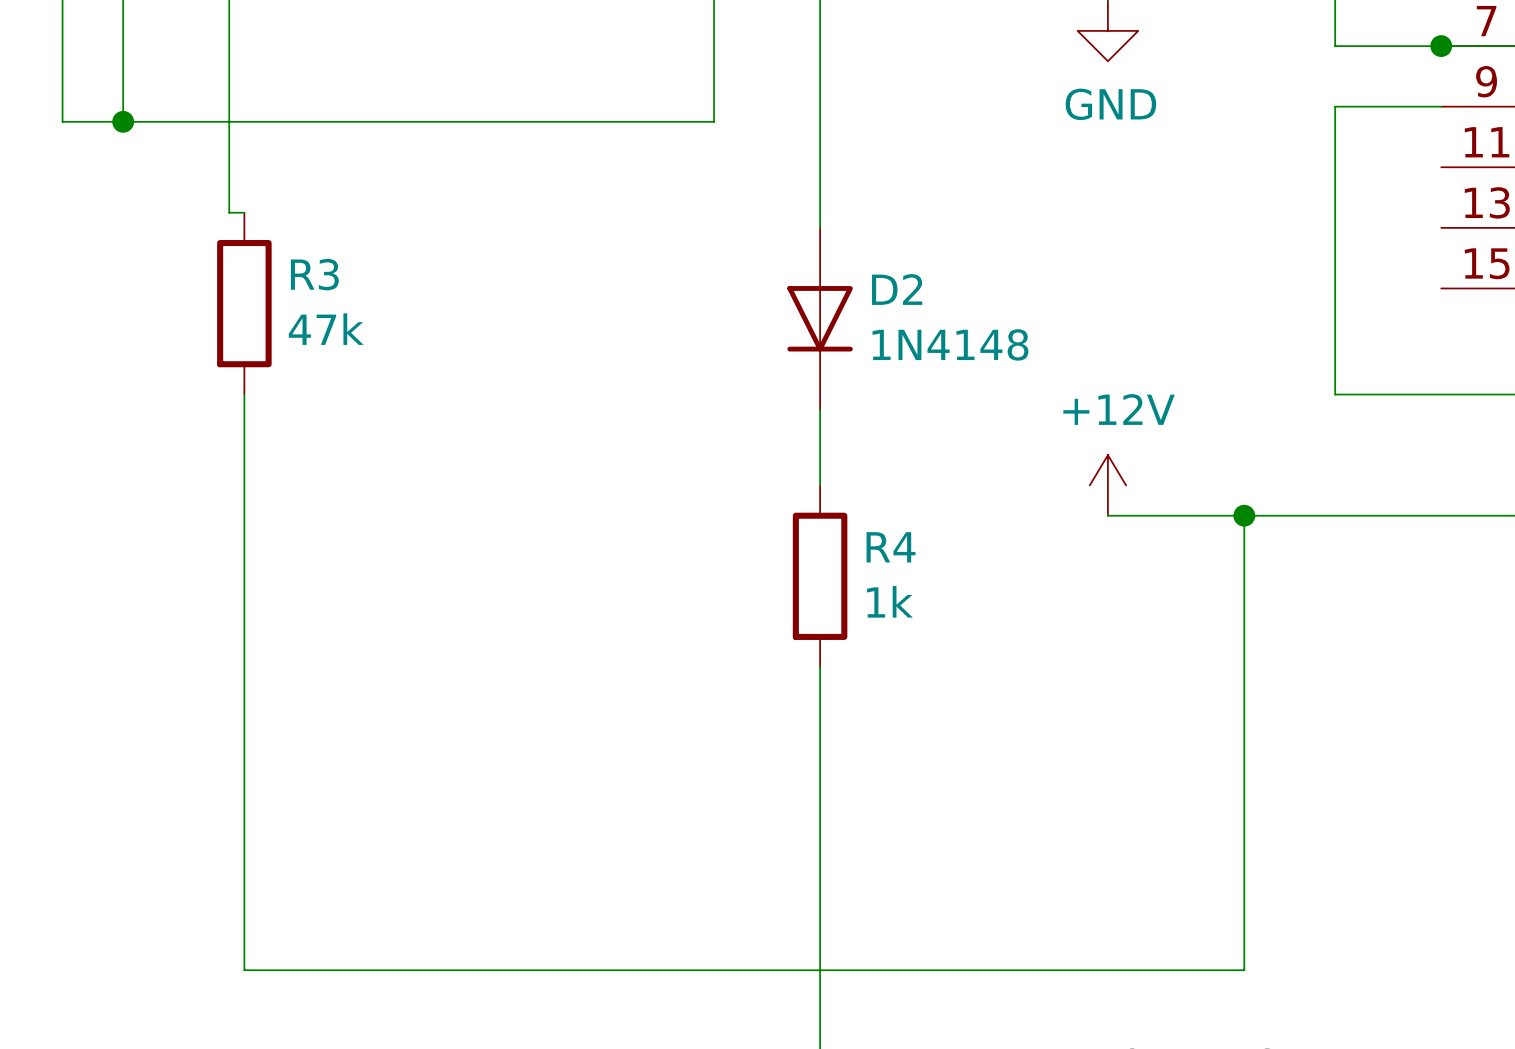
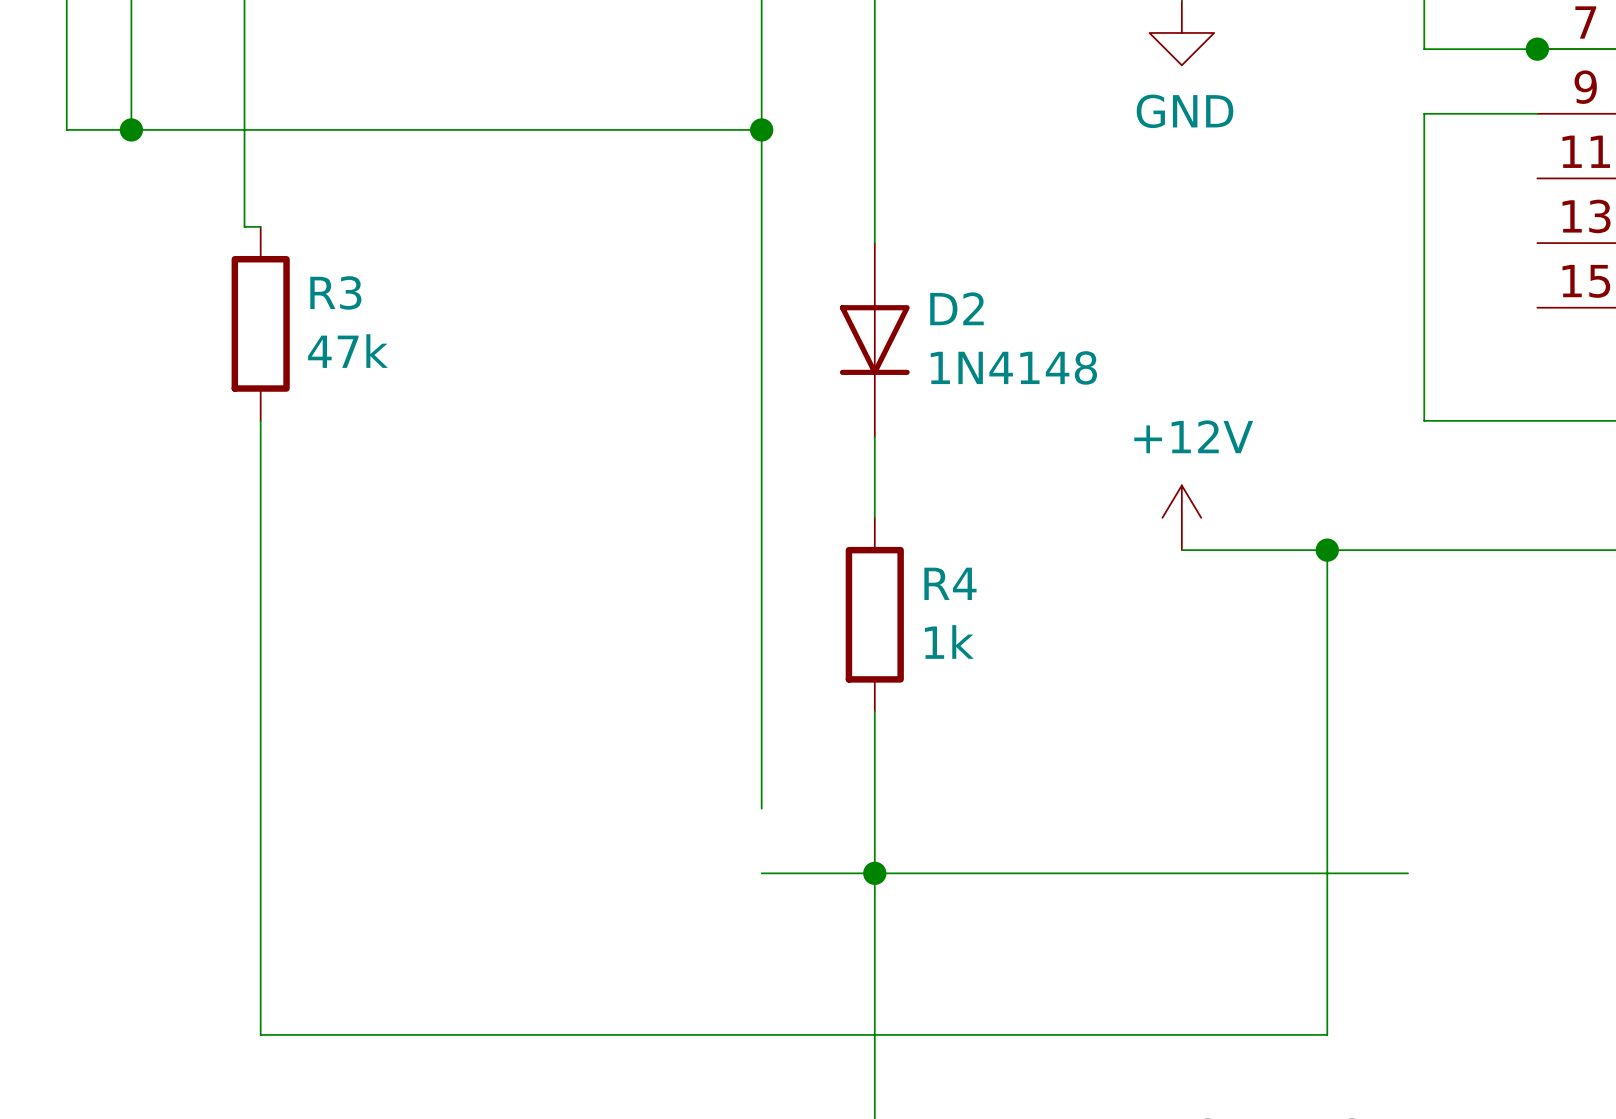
wire: none -> (761, 129) (761, 808)
junction: none -> (761, 129)
wire: none -> (761, 873) (1408, 873)
junction: none -> (874, 873)

